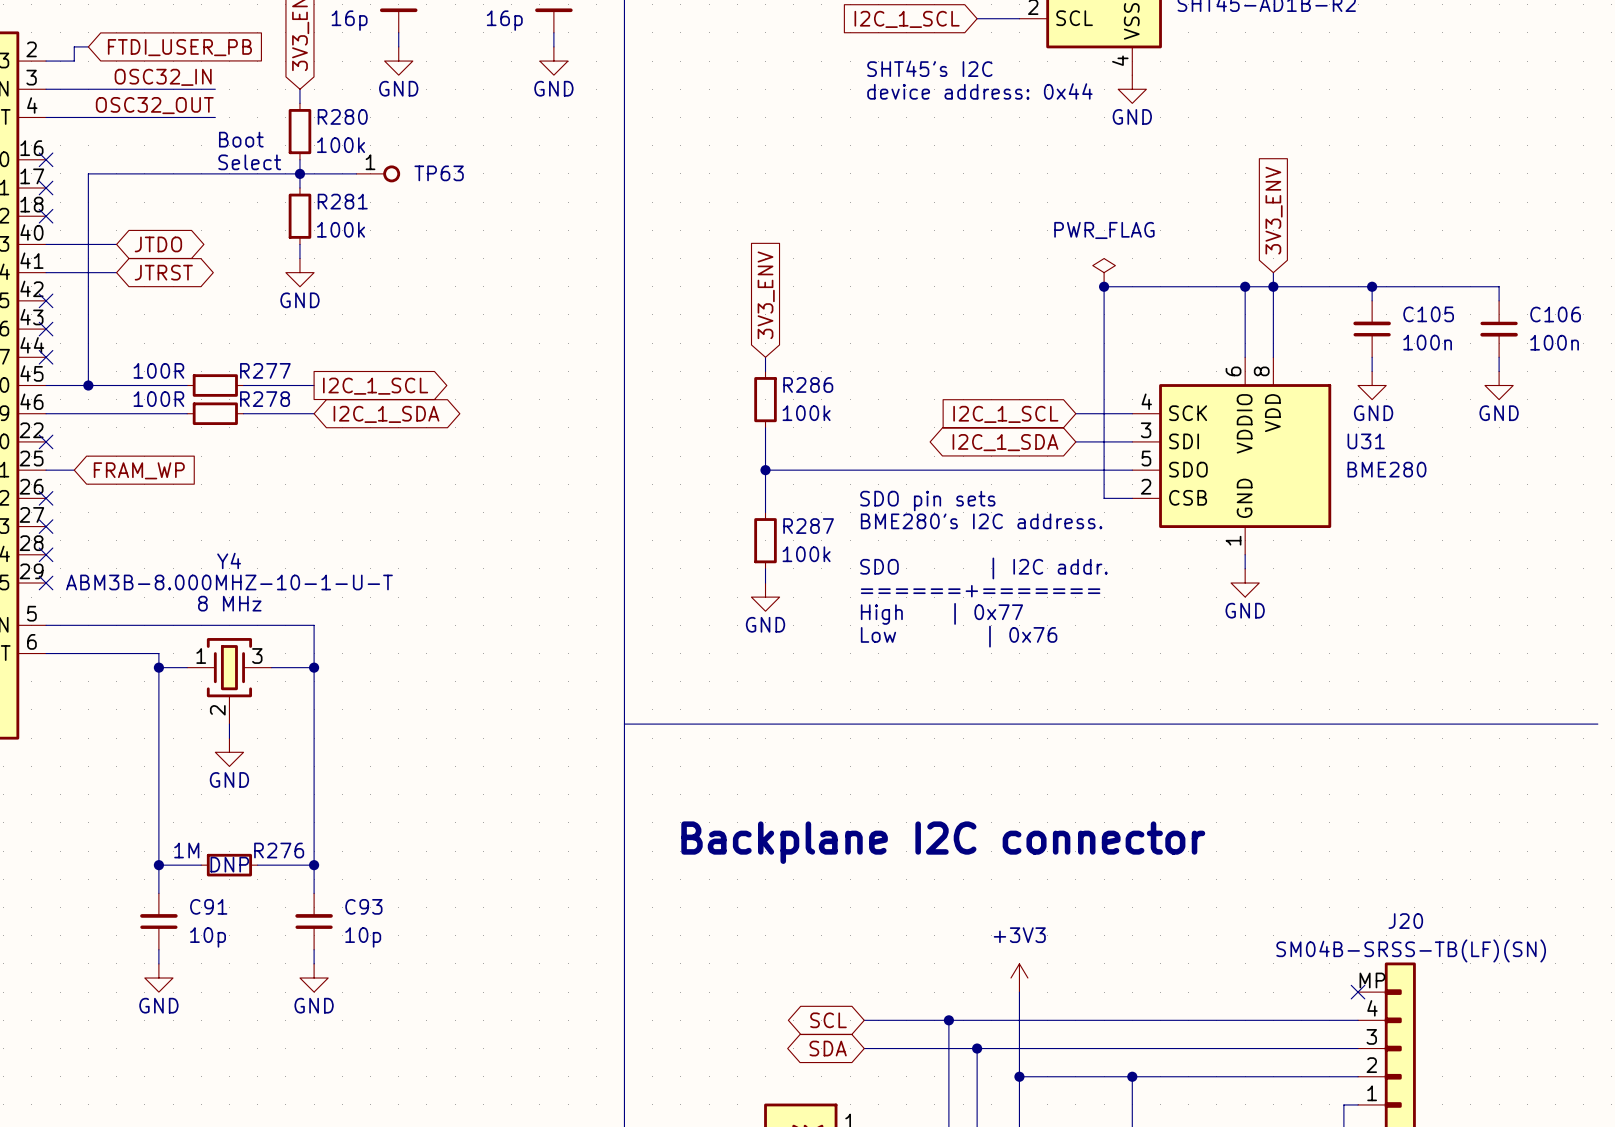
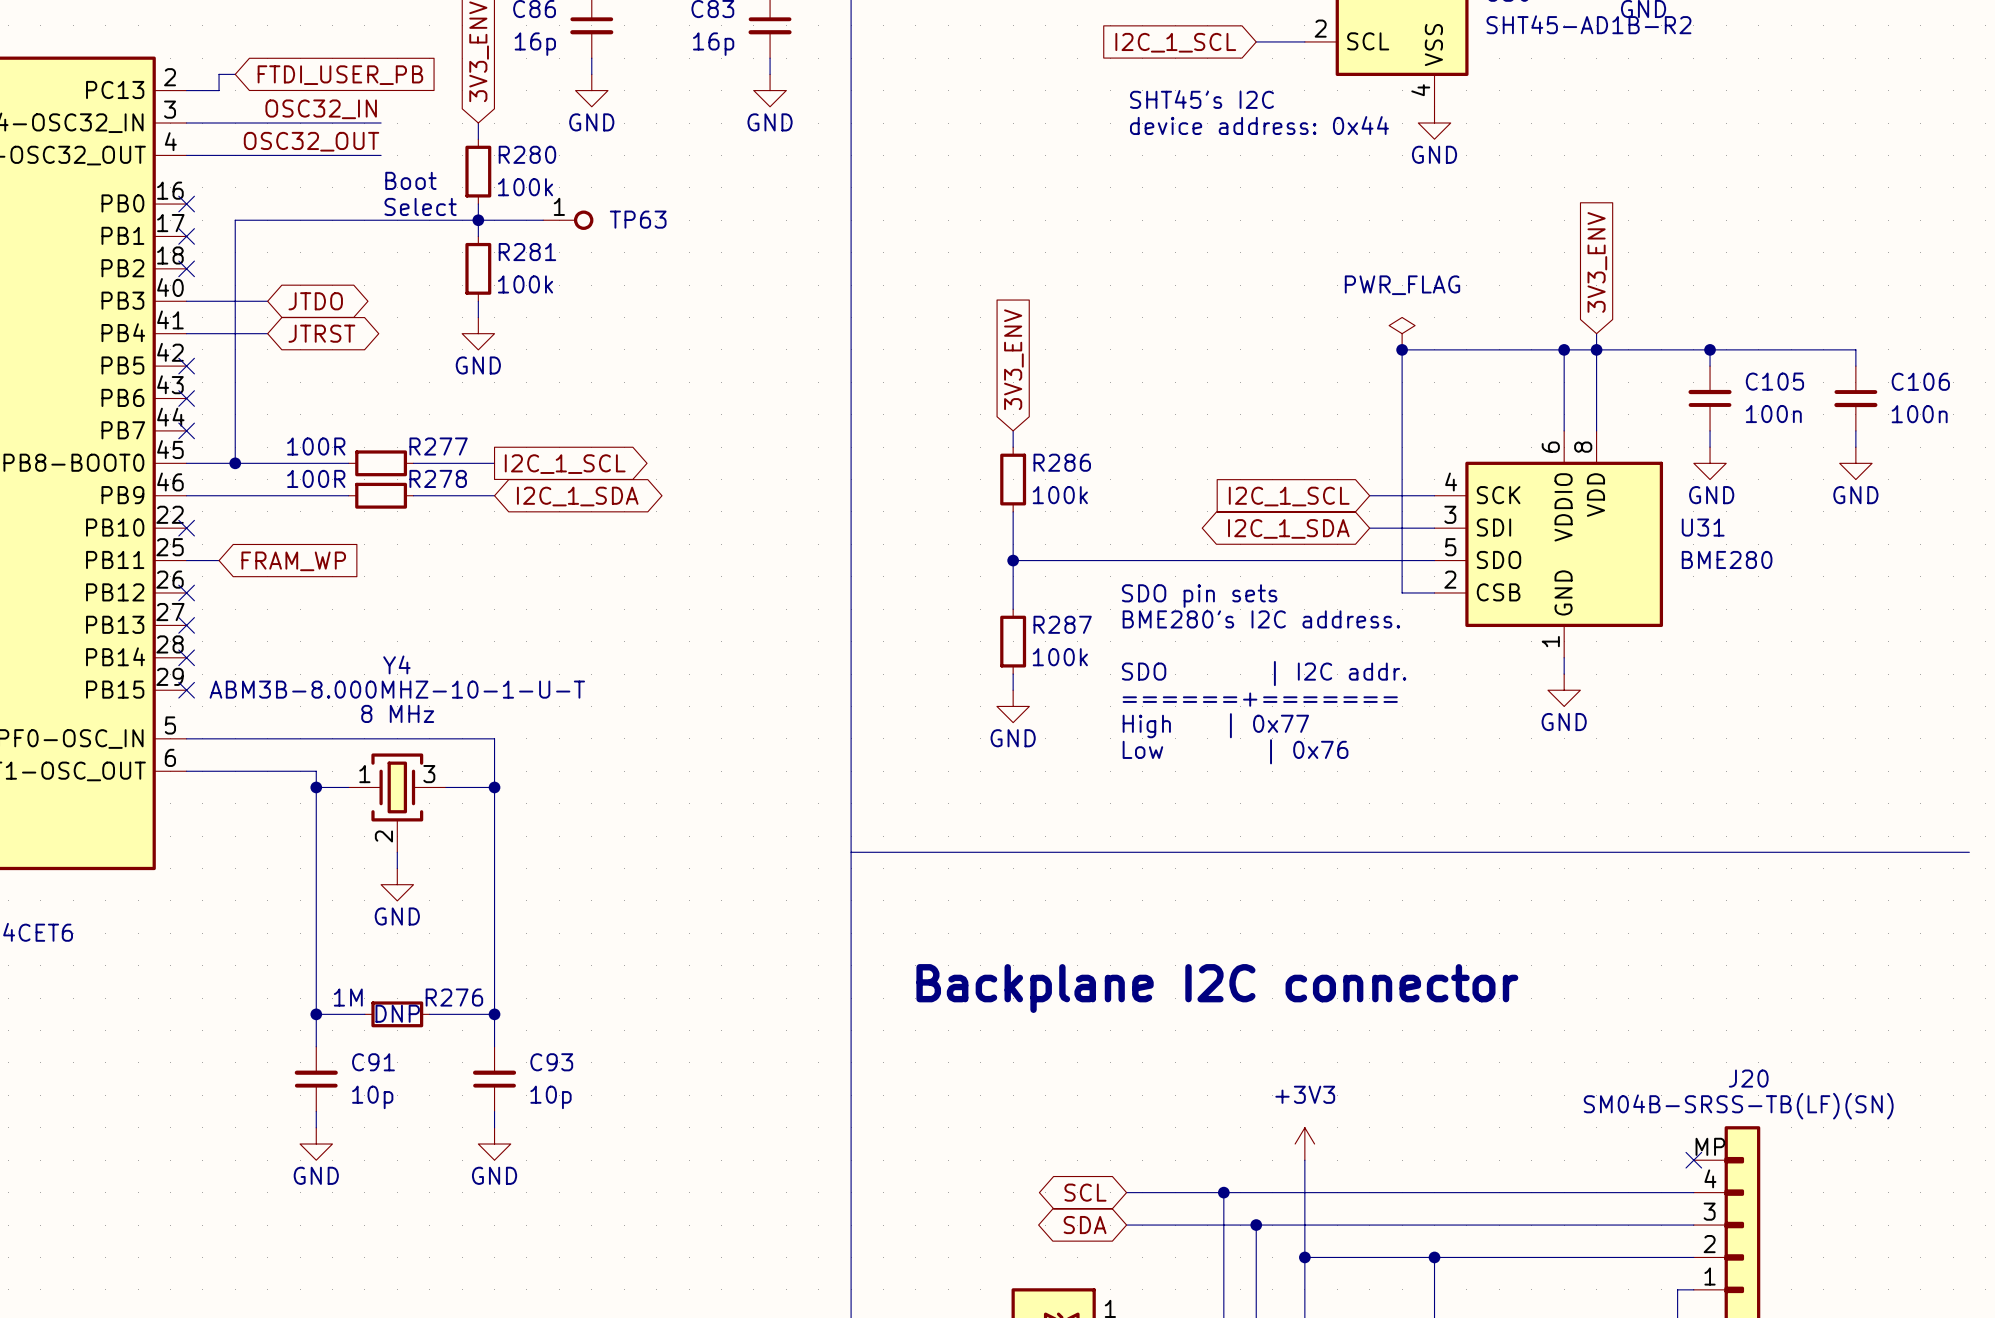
J20 text position: SM04B-SRSS-TB(LF)(SN) (1411, 950) -> SM04B-SRSS-TB(LF)(SN) (1738, 1106)

